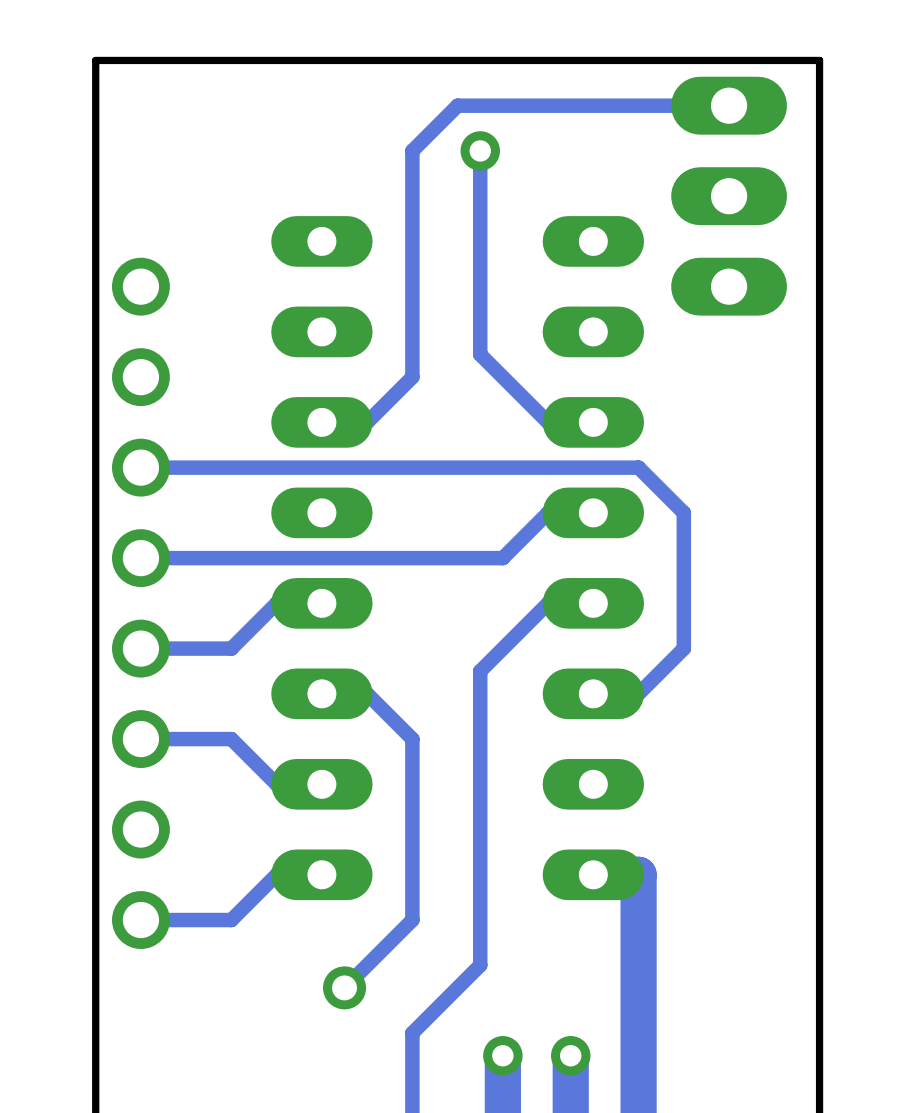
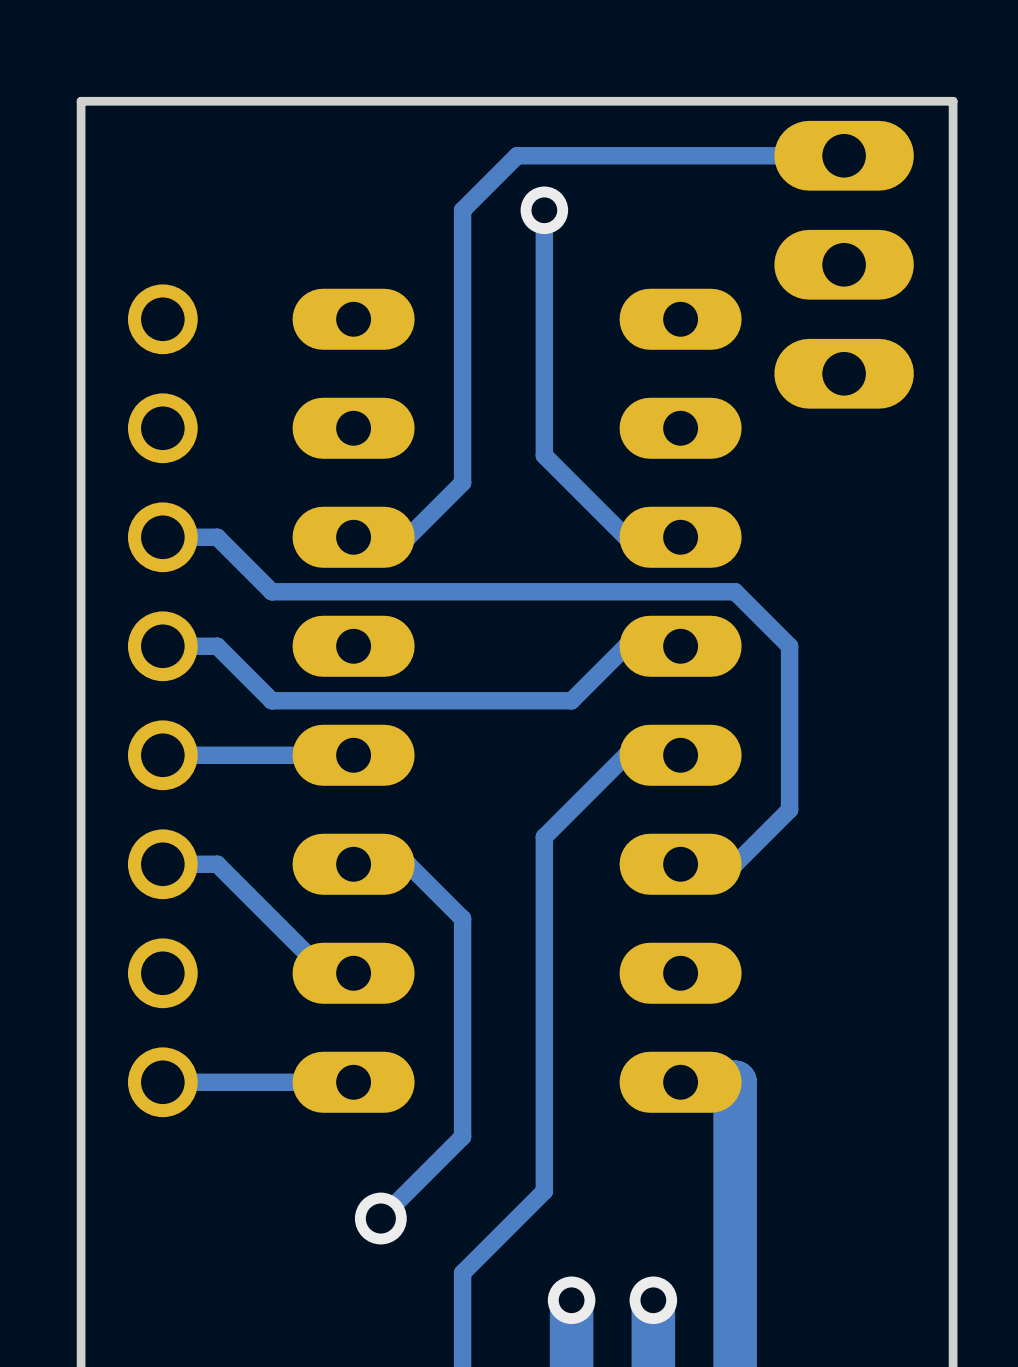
track: (254, 467) (140, 467) -> (271, 591) (217, 537) (162, 537)
track: (254, 558) (140, 558) -> (271, 700) (217, 646) (162, 646)
part position: (140, 603) -> (162, 700)
track: (276, 603) (231, 648) (140, 648) -> (299, 755) (162, 755)
track: (140, 739) (231, 739) (276, 784) (299, 784) -> (162, 864) (217, 864) (326, 973)
track: (276, 874) (231, 920) (140, 920) -> (299, 1082) (162, 1082)

